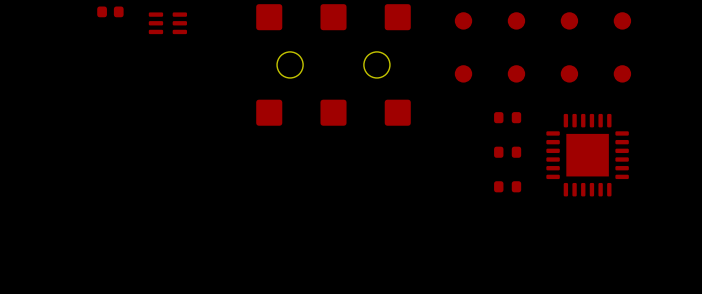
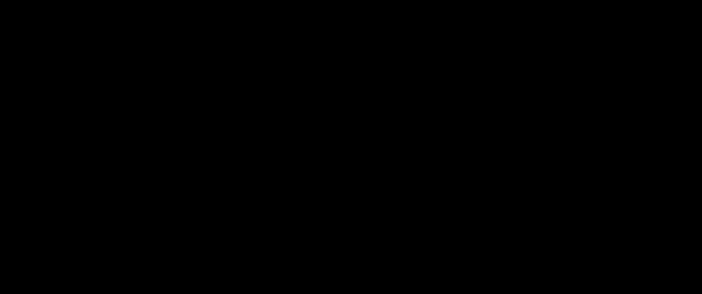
part: (110, 11) -> none
part: (463, 20) -> none
part: (516, 20) -> none
part: (569, 20) -> none
part: (622, 20) -> none
part: (167, 23) -> none
part: (333, 64) -> none
part: (463, 73) -> none
part: (516, 73) -> none
part: (569, 73) -> none
part: (622, 73) -> none
part: (507, 117) -> none
part: (507, 152) -> none
part: (587, 155) -> none
part: (507, 186) -> none

